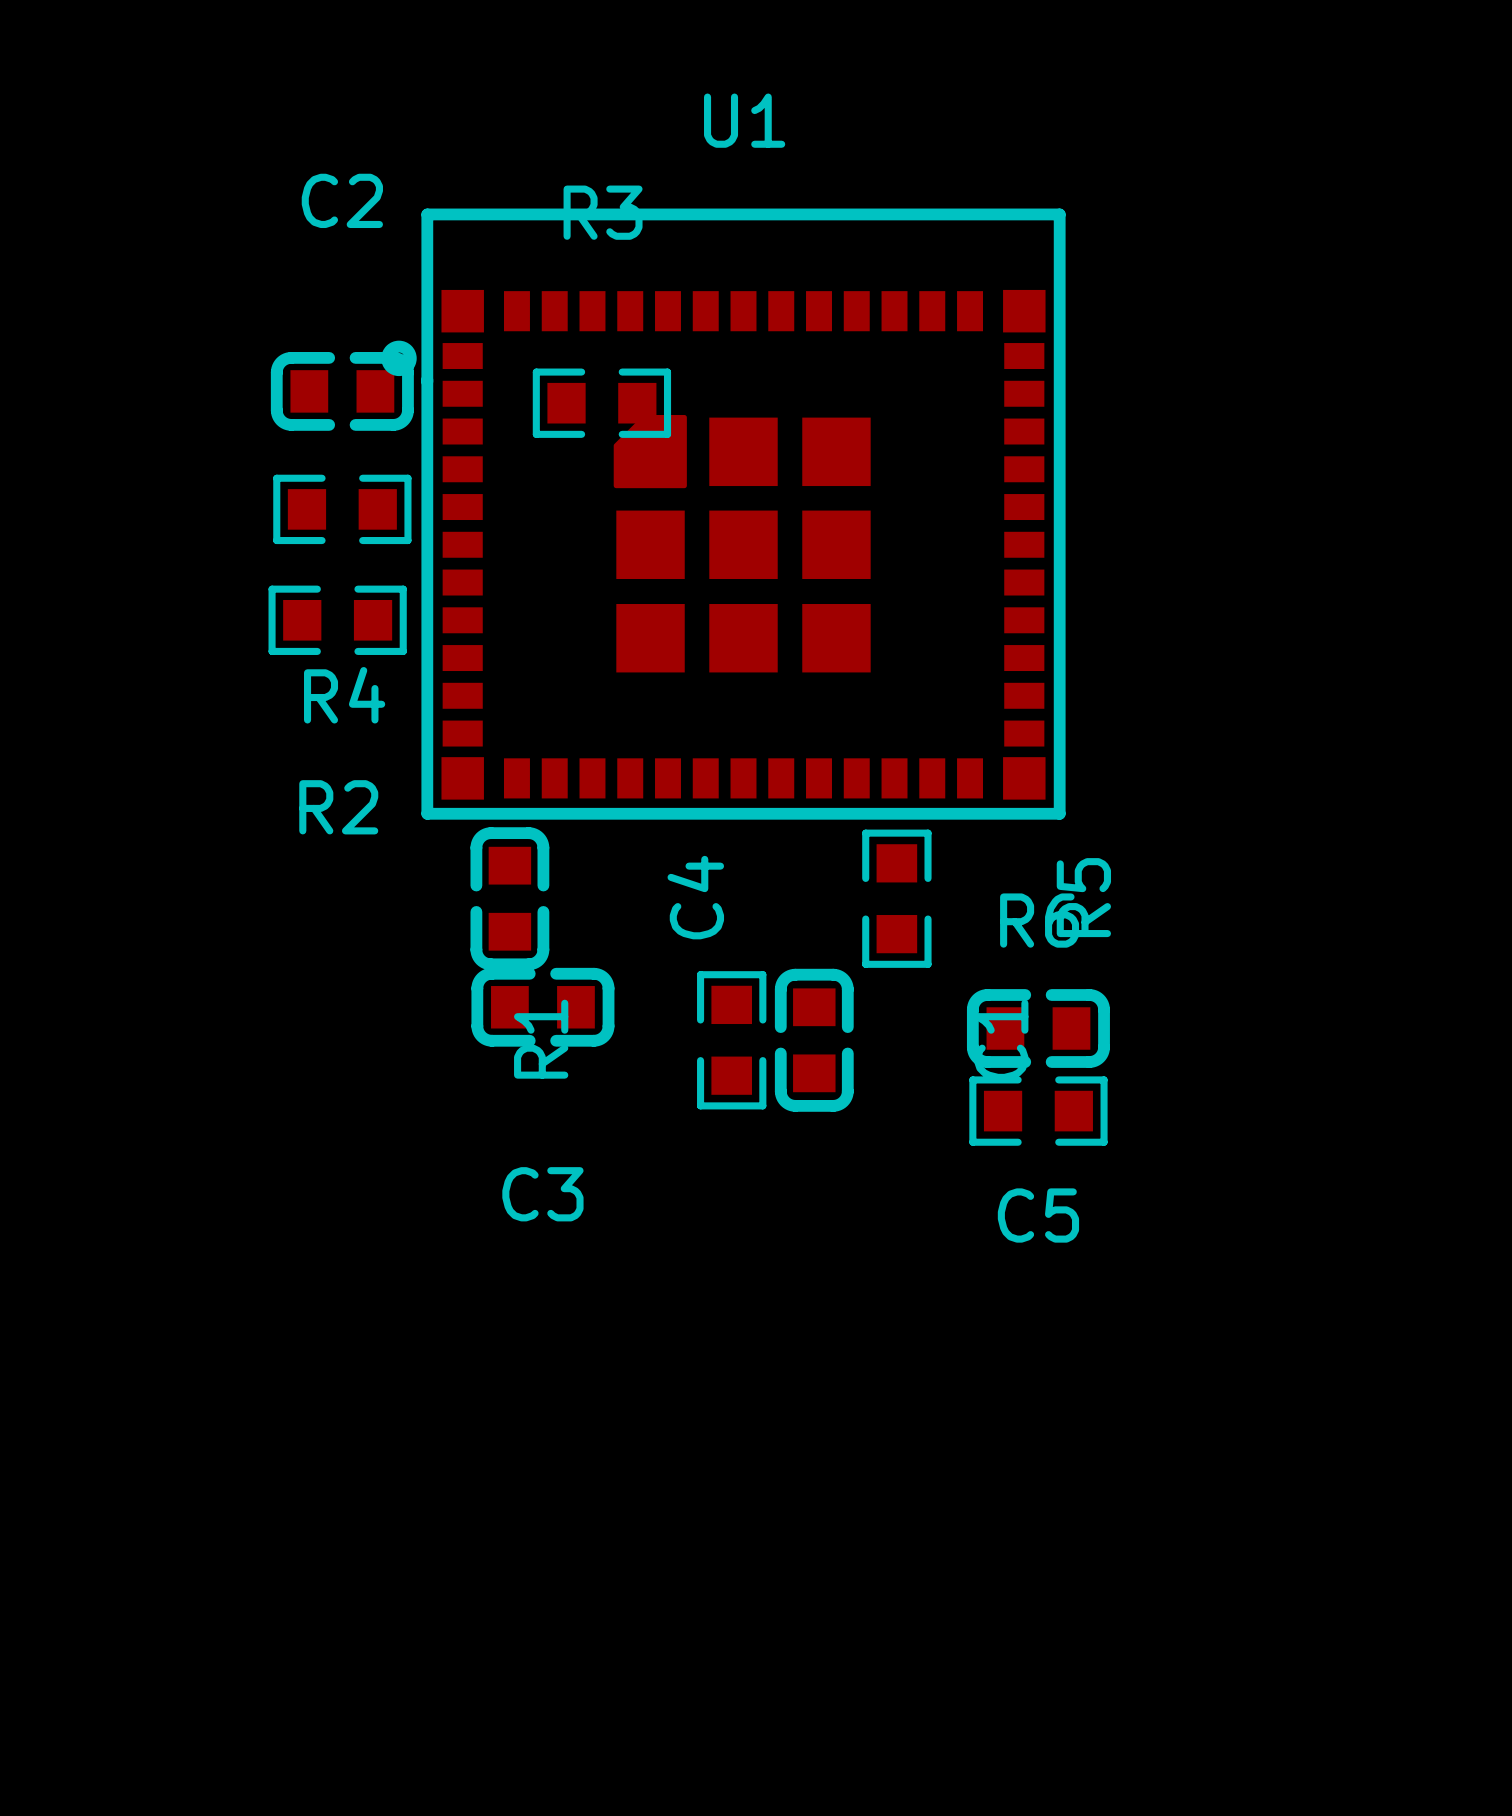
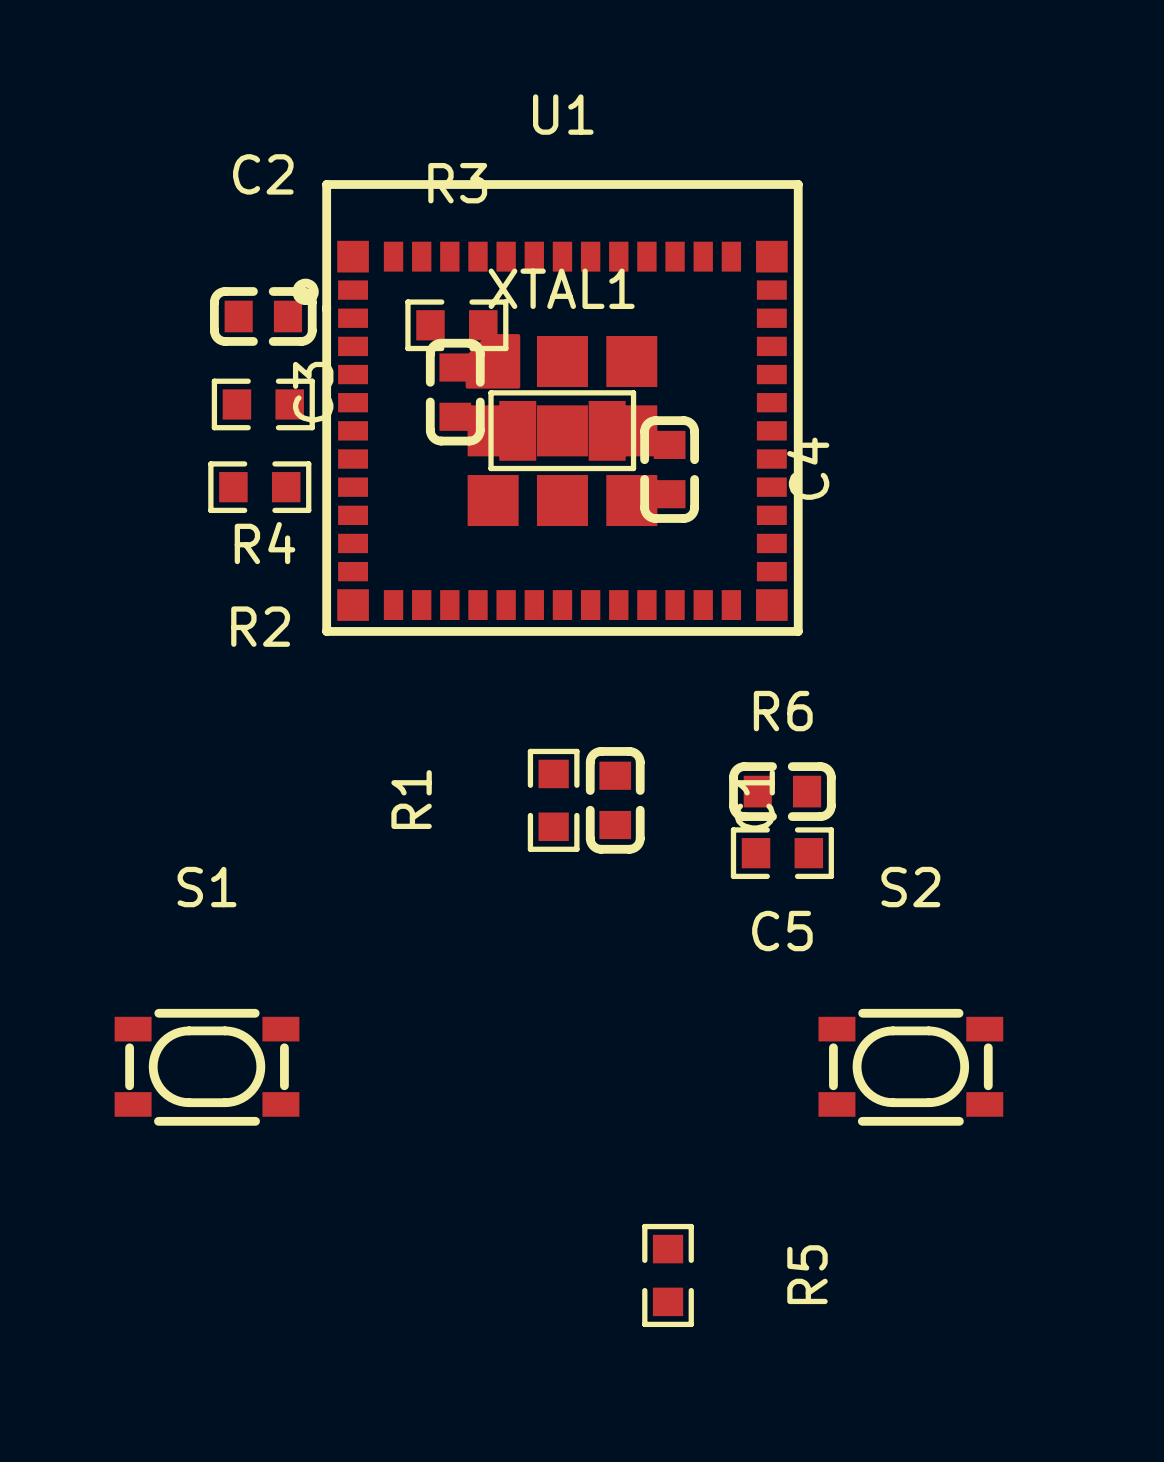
XTAL1: none -> (562, 430)
C4 position: (509, 898) -> (669, 469)
R5 position: (896, 898) -> (668, 1275)
C3 rotation: 0° (542, 1007) -> 90° clockwise (455, 392)
C3 position: (542, 1007) -> (455, 392)
S1: none -> (207, 1067)
S2: none -> (910, 1067)

